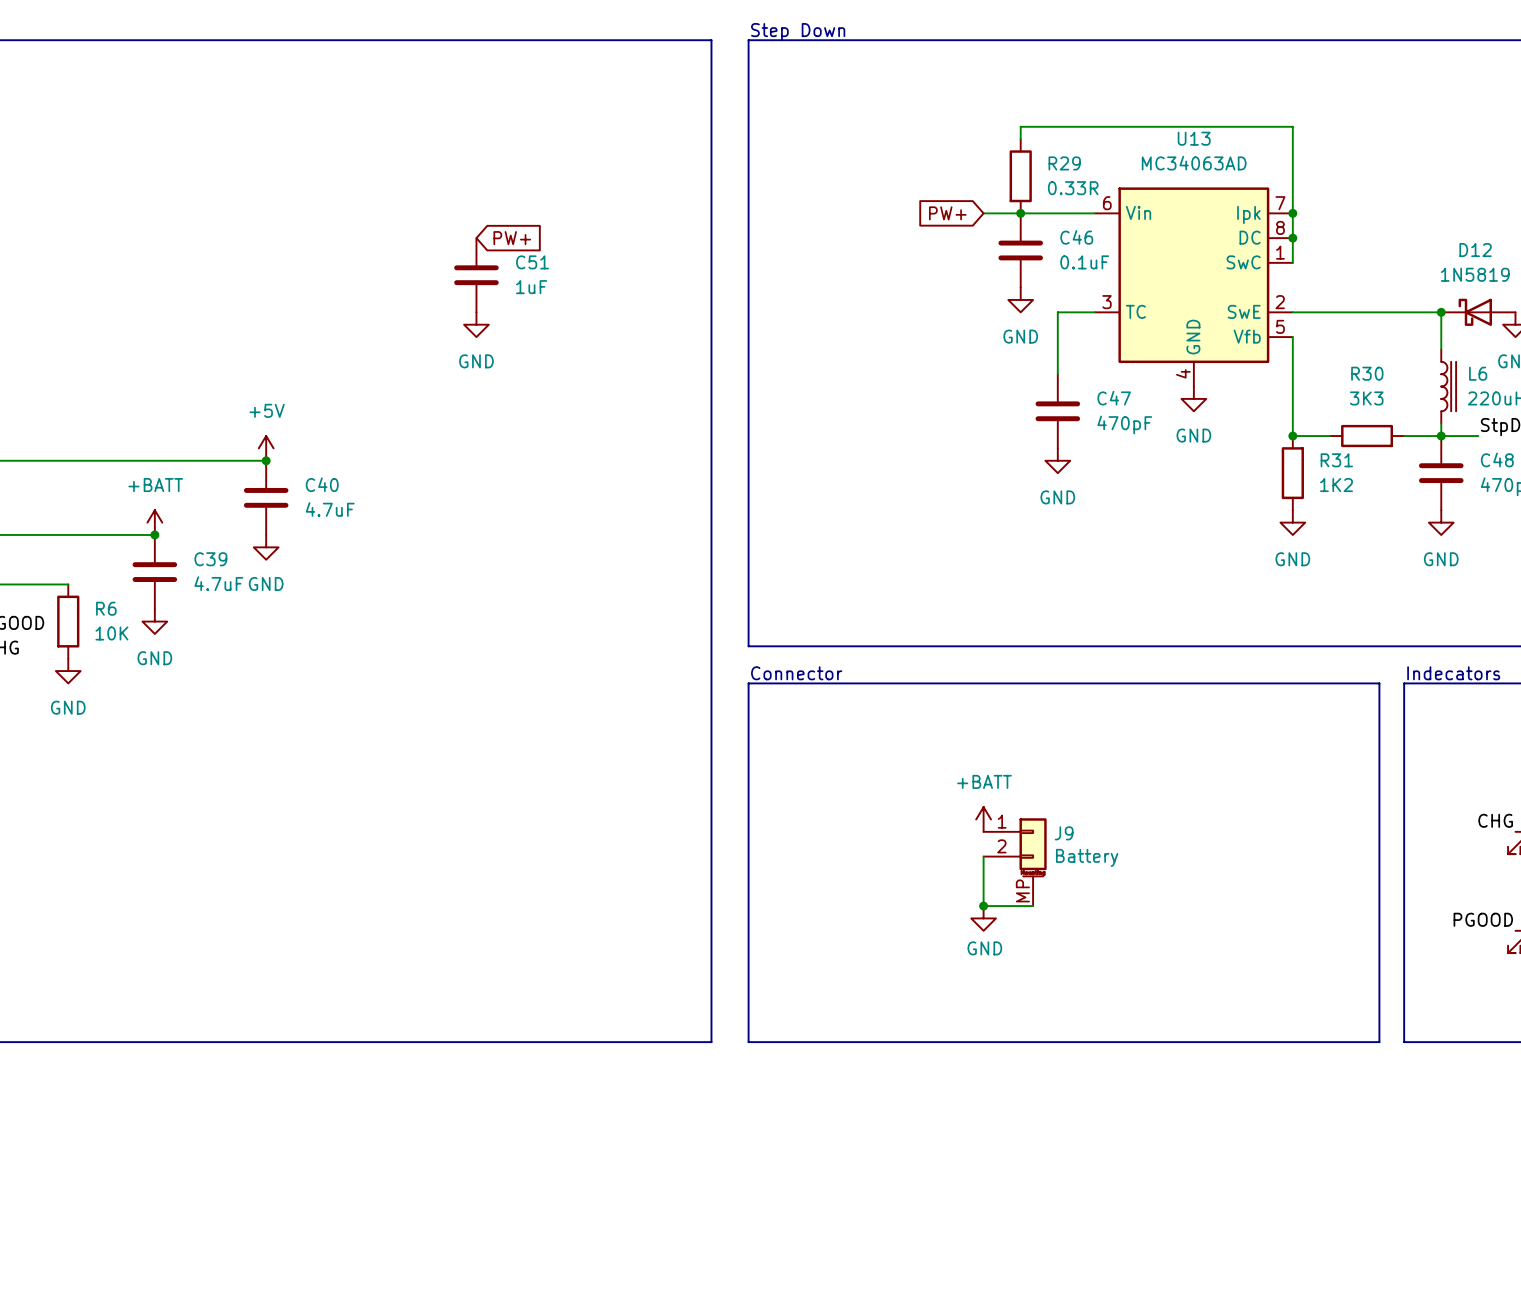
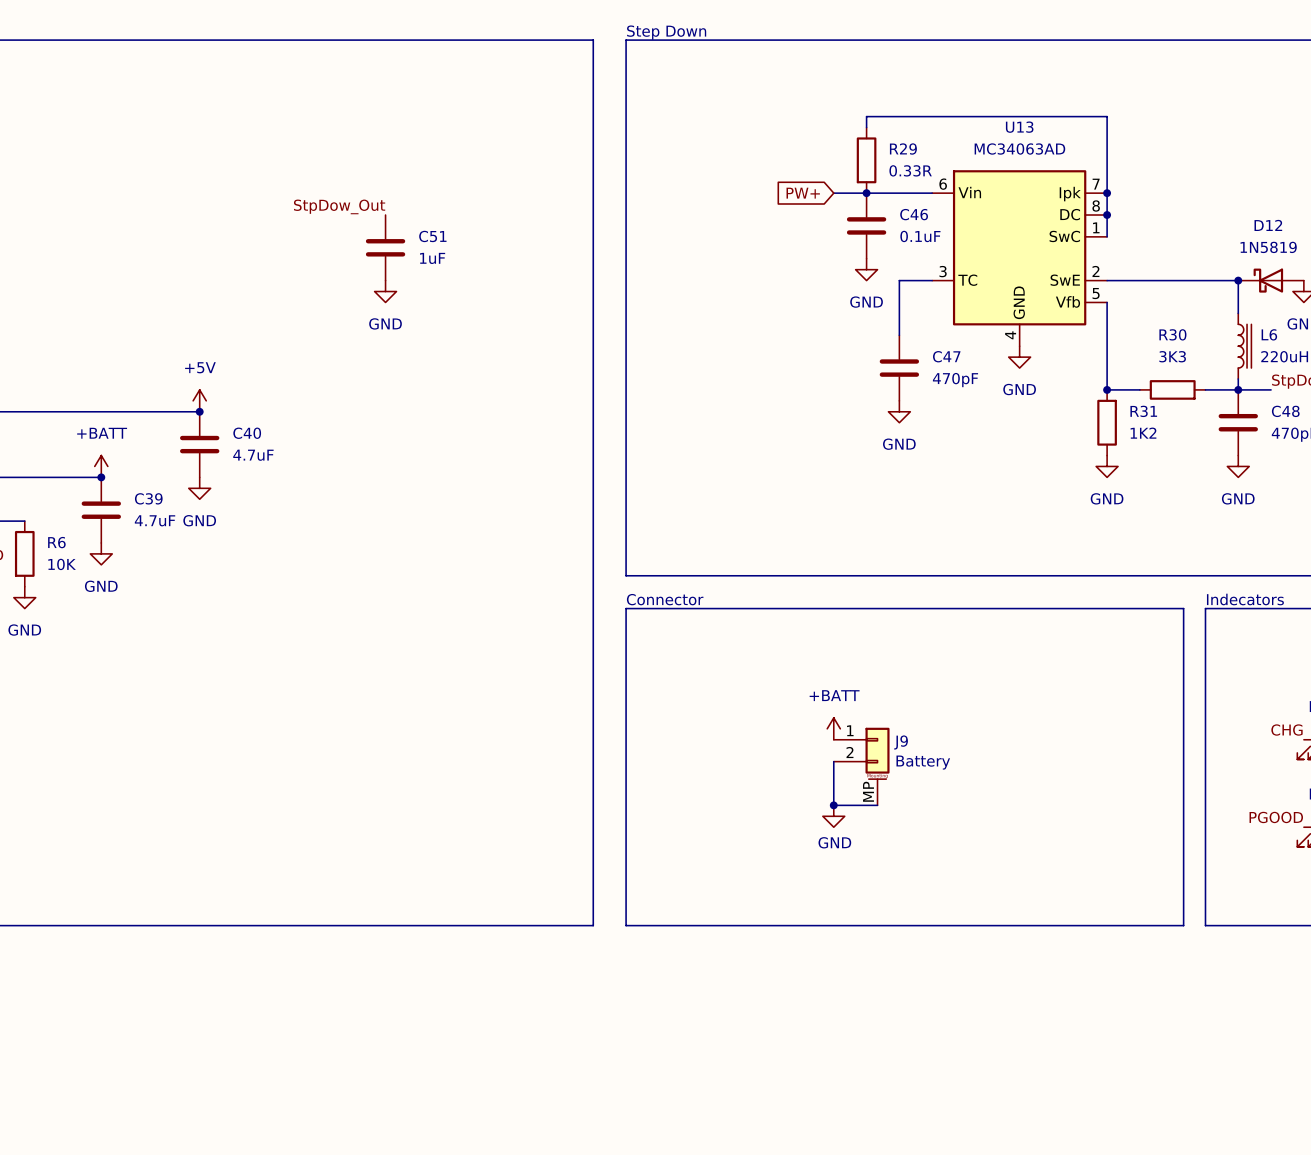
label: none -> StpDow_Out (339, 206)
global label: PW+ (512, 238) -> none

